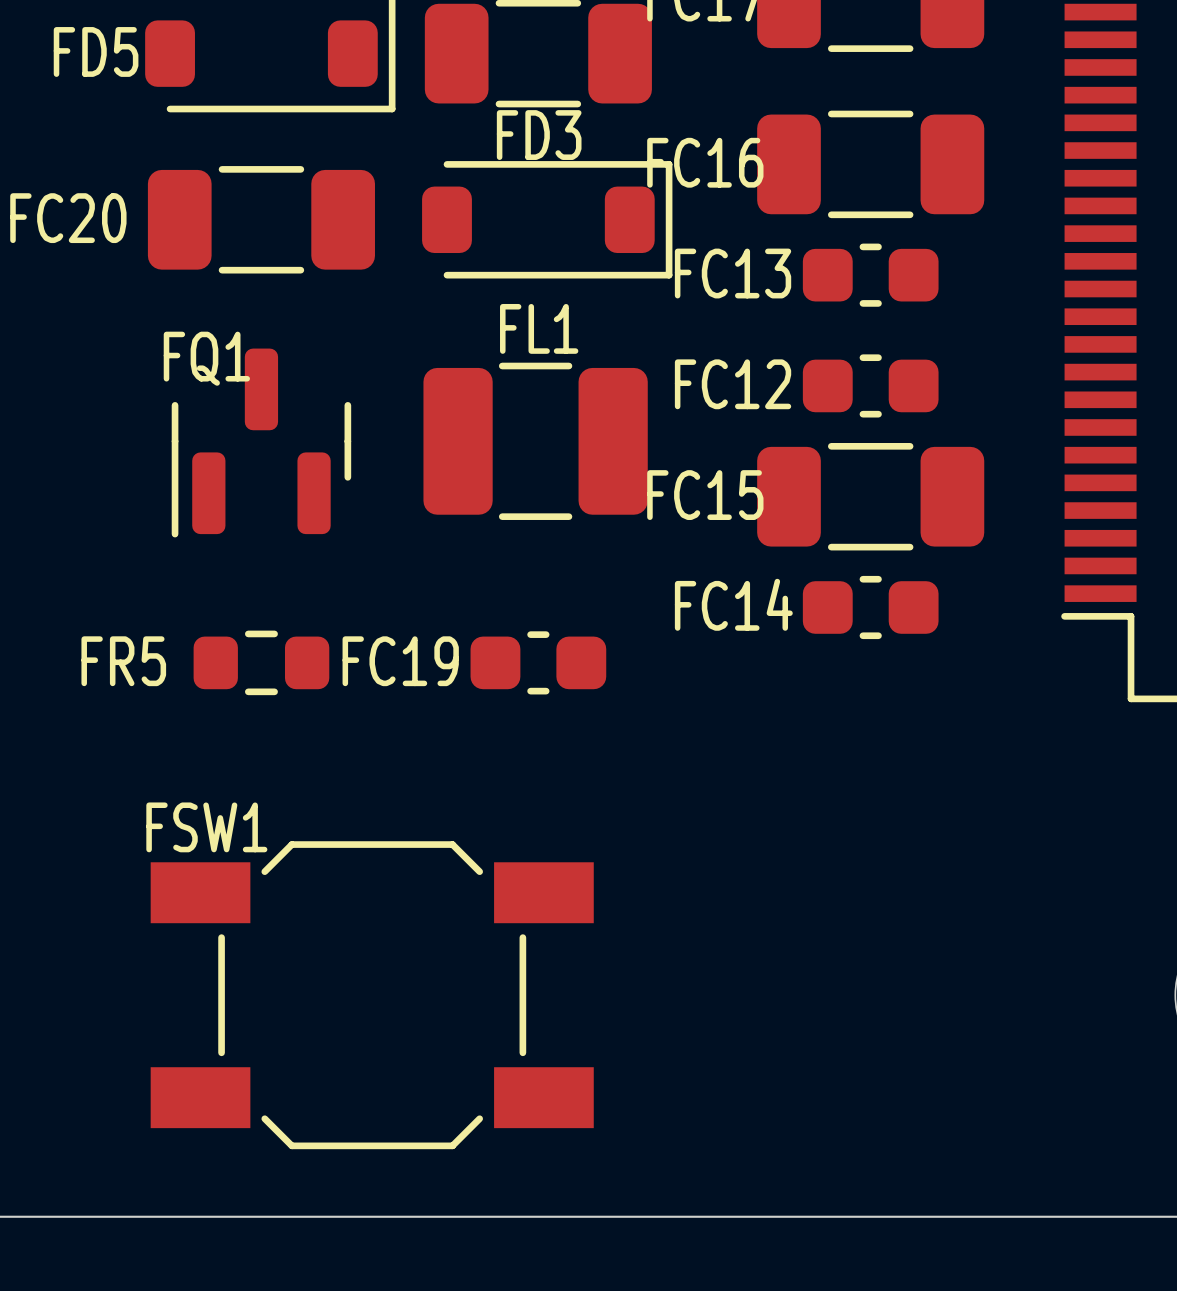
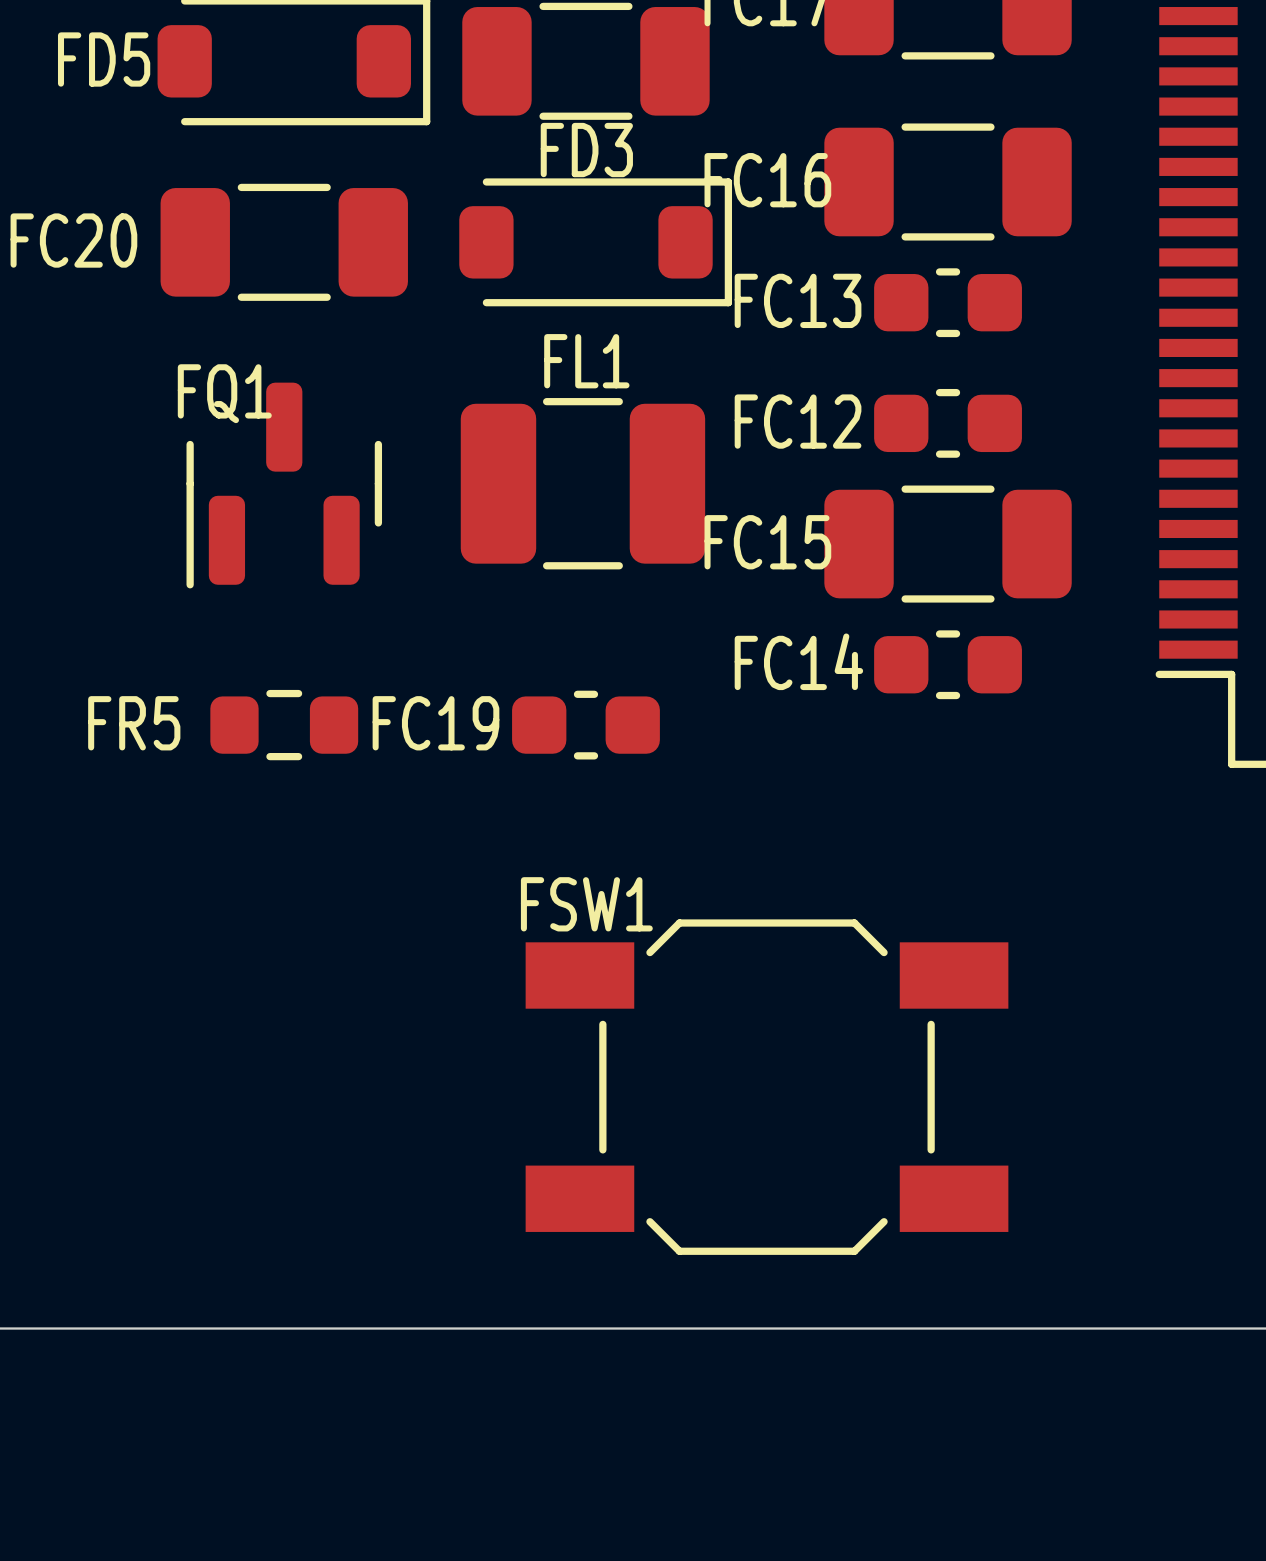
FSW1 position: (372, 995) -> (767, 1087)

